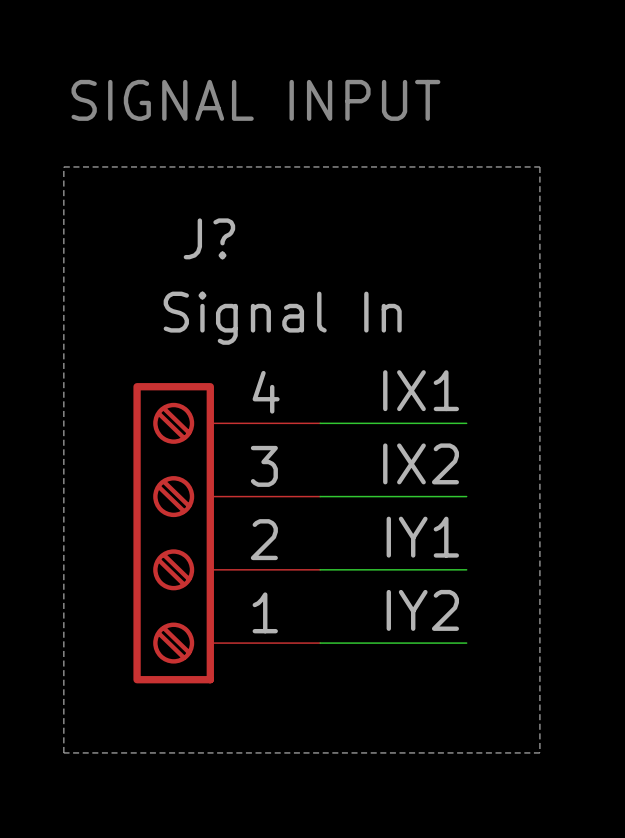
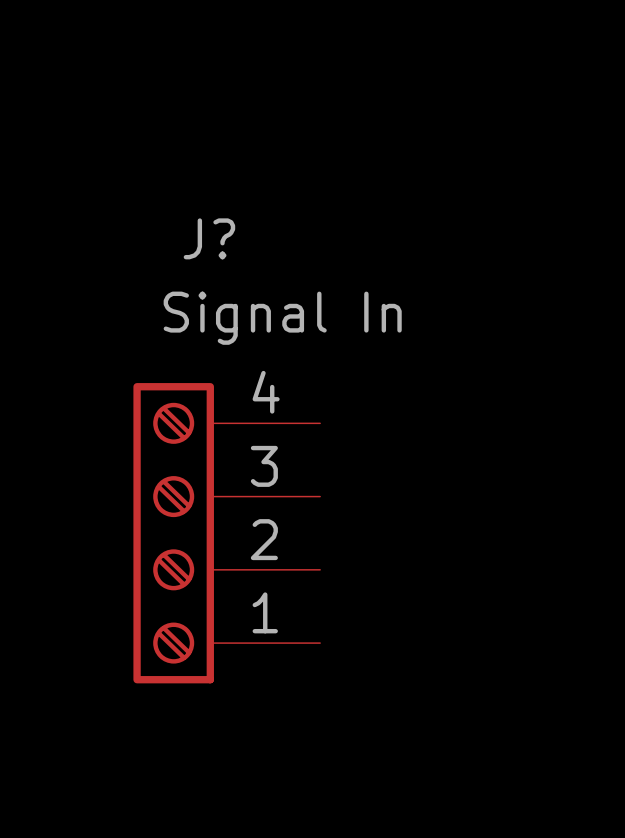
text: SIGNAL INPUT (255, 100) -> none
line: (63, 166) (539, 166) (539, 752) (63, 752) (63, 166) -> none
label: IX1 (421, 390) -> none
wire: (320, 423) (466, 423) -> none
label: IX2 (421, 463) -> none
wire: (320, 496) (466, 496) -> none
label: IY1 (422, 537) -> none
wire: (320, 569) (466, 569) -> none
label: IY2 (422, 610) -> none
wire: (320, 643) (466, 643) -> none

